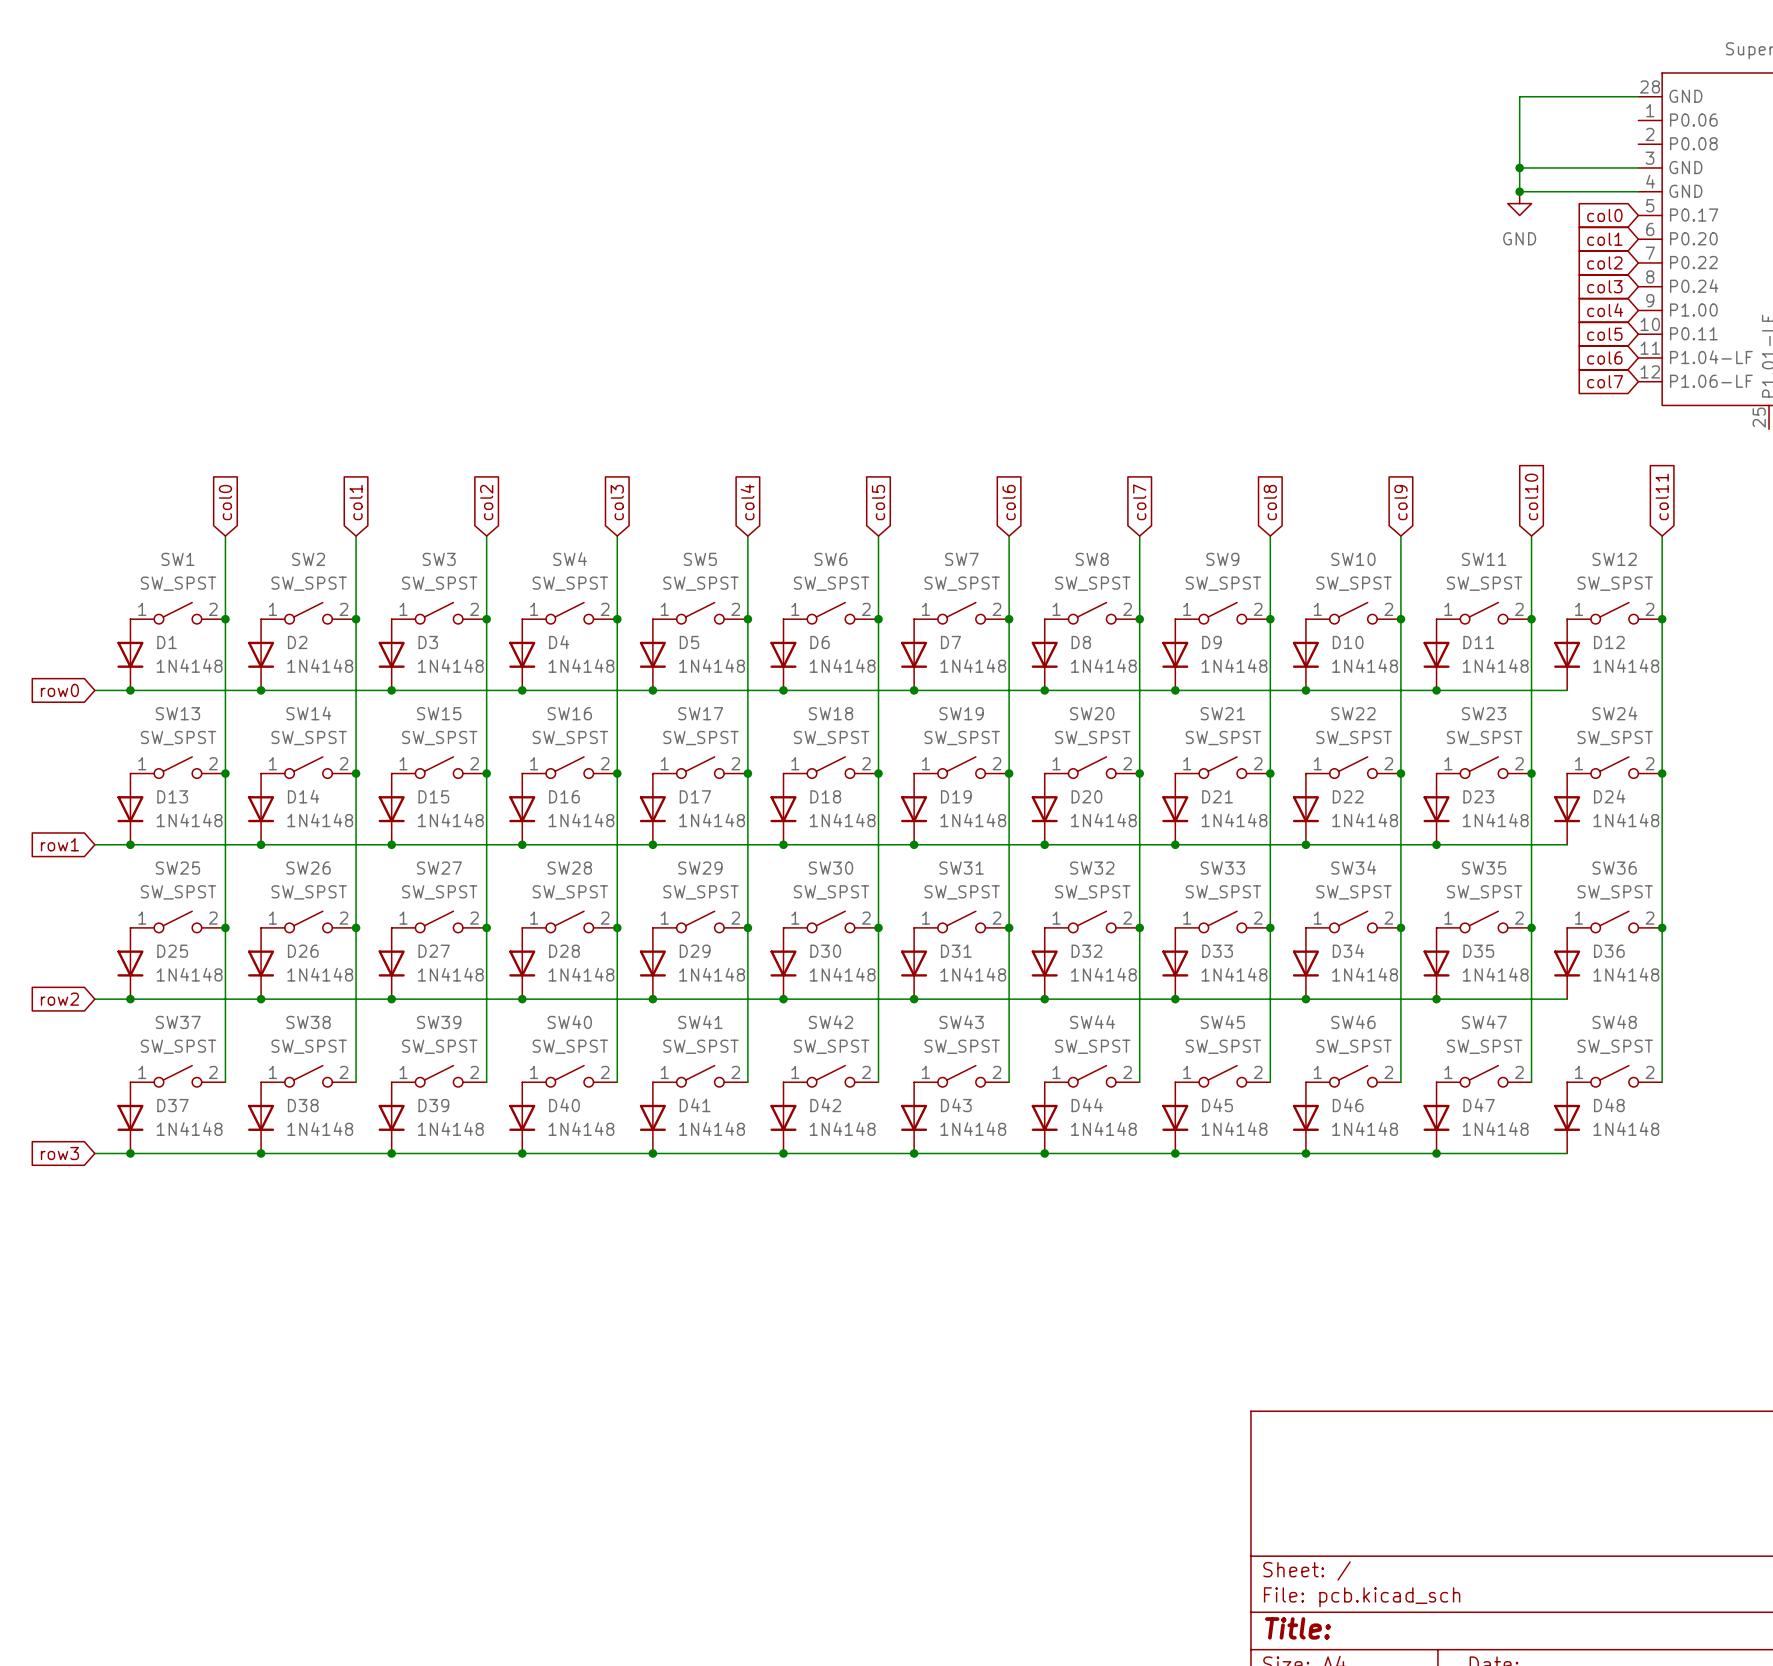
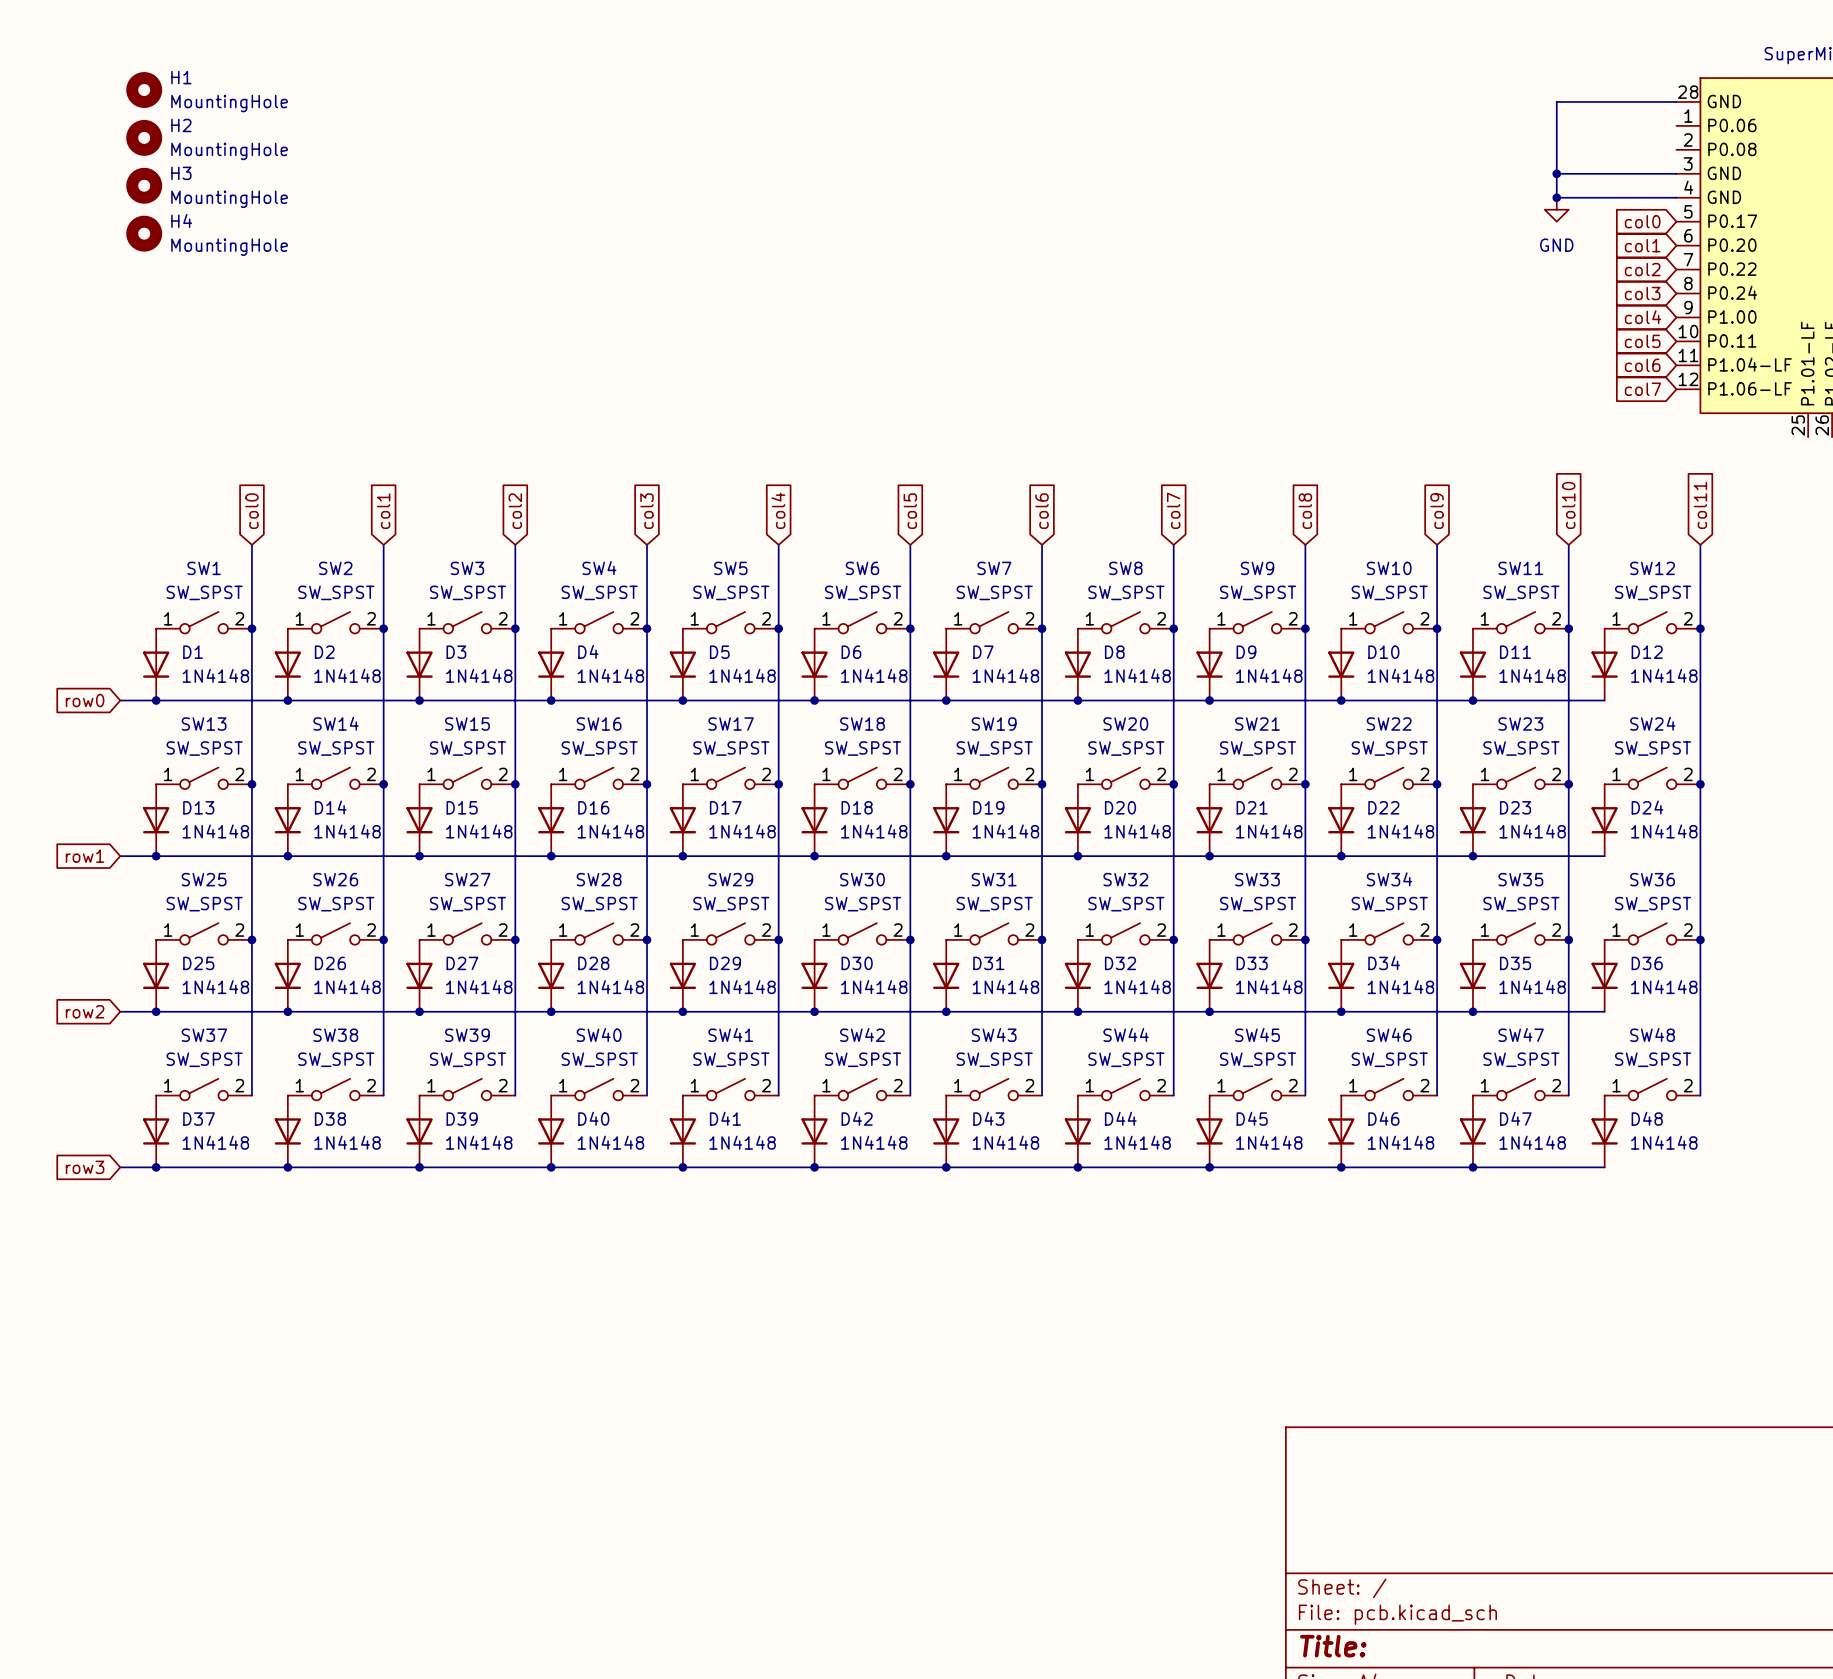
H1: none -> MountingHole (144, 90)
H2: none -> MountingHole (144, 137)
H3: none -> MountingHole (144, 185)
H4: none -> MountingHole (144, 233)

